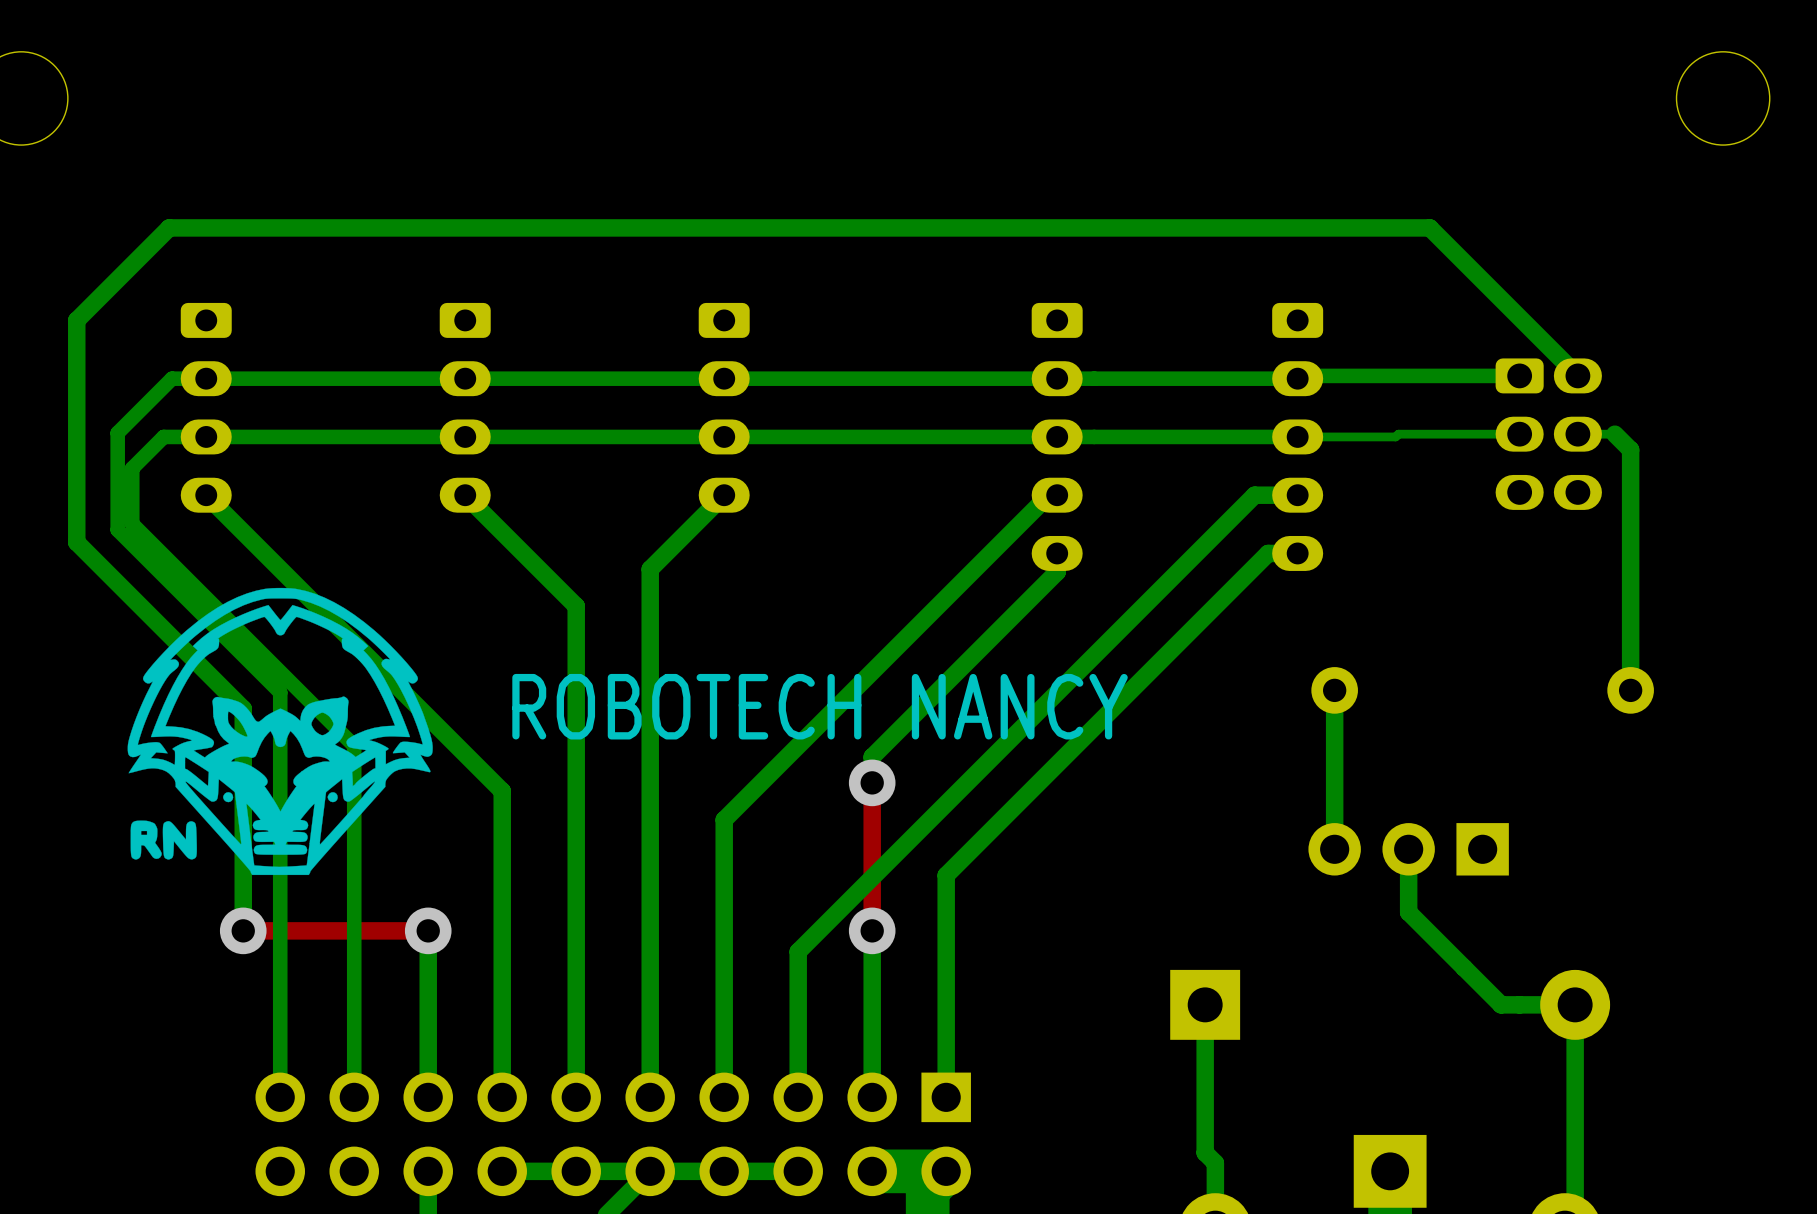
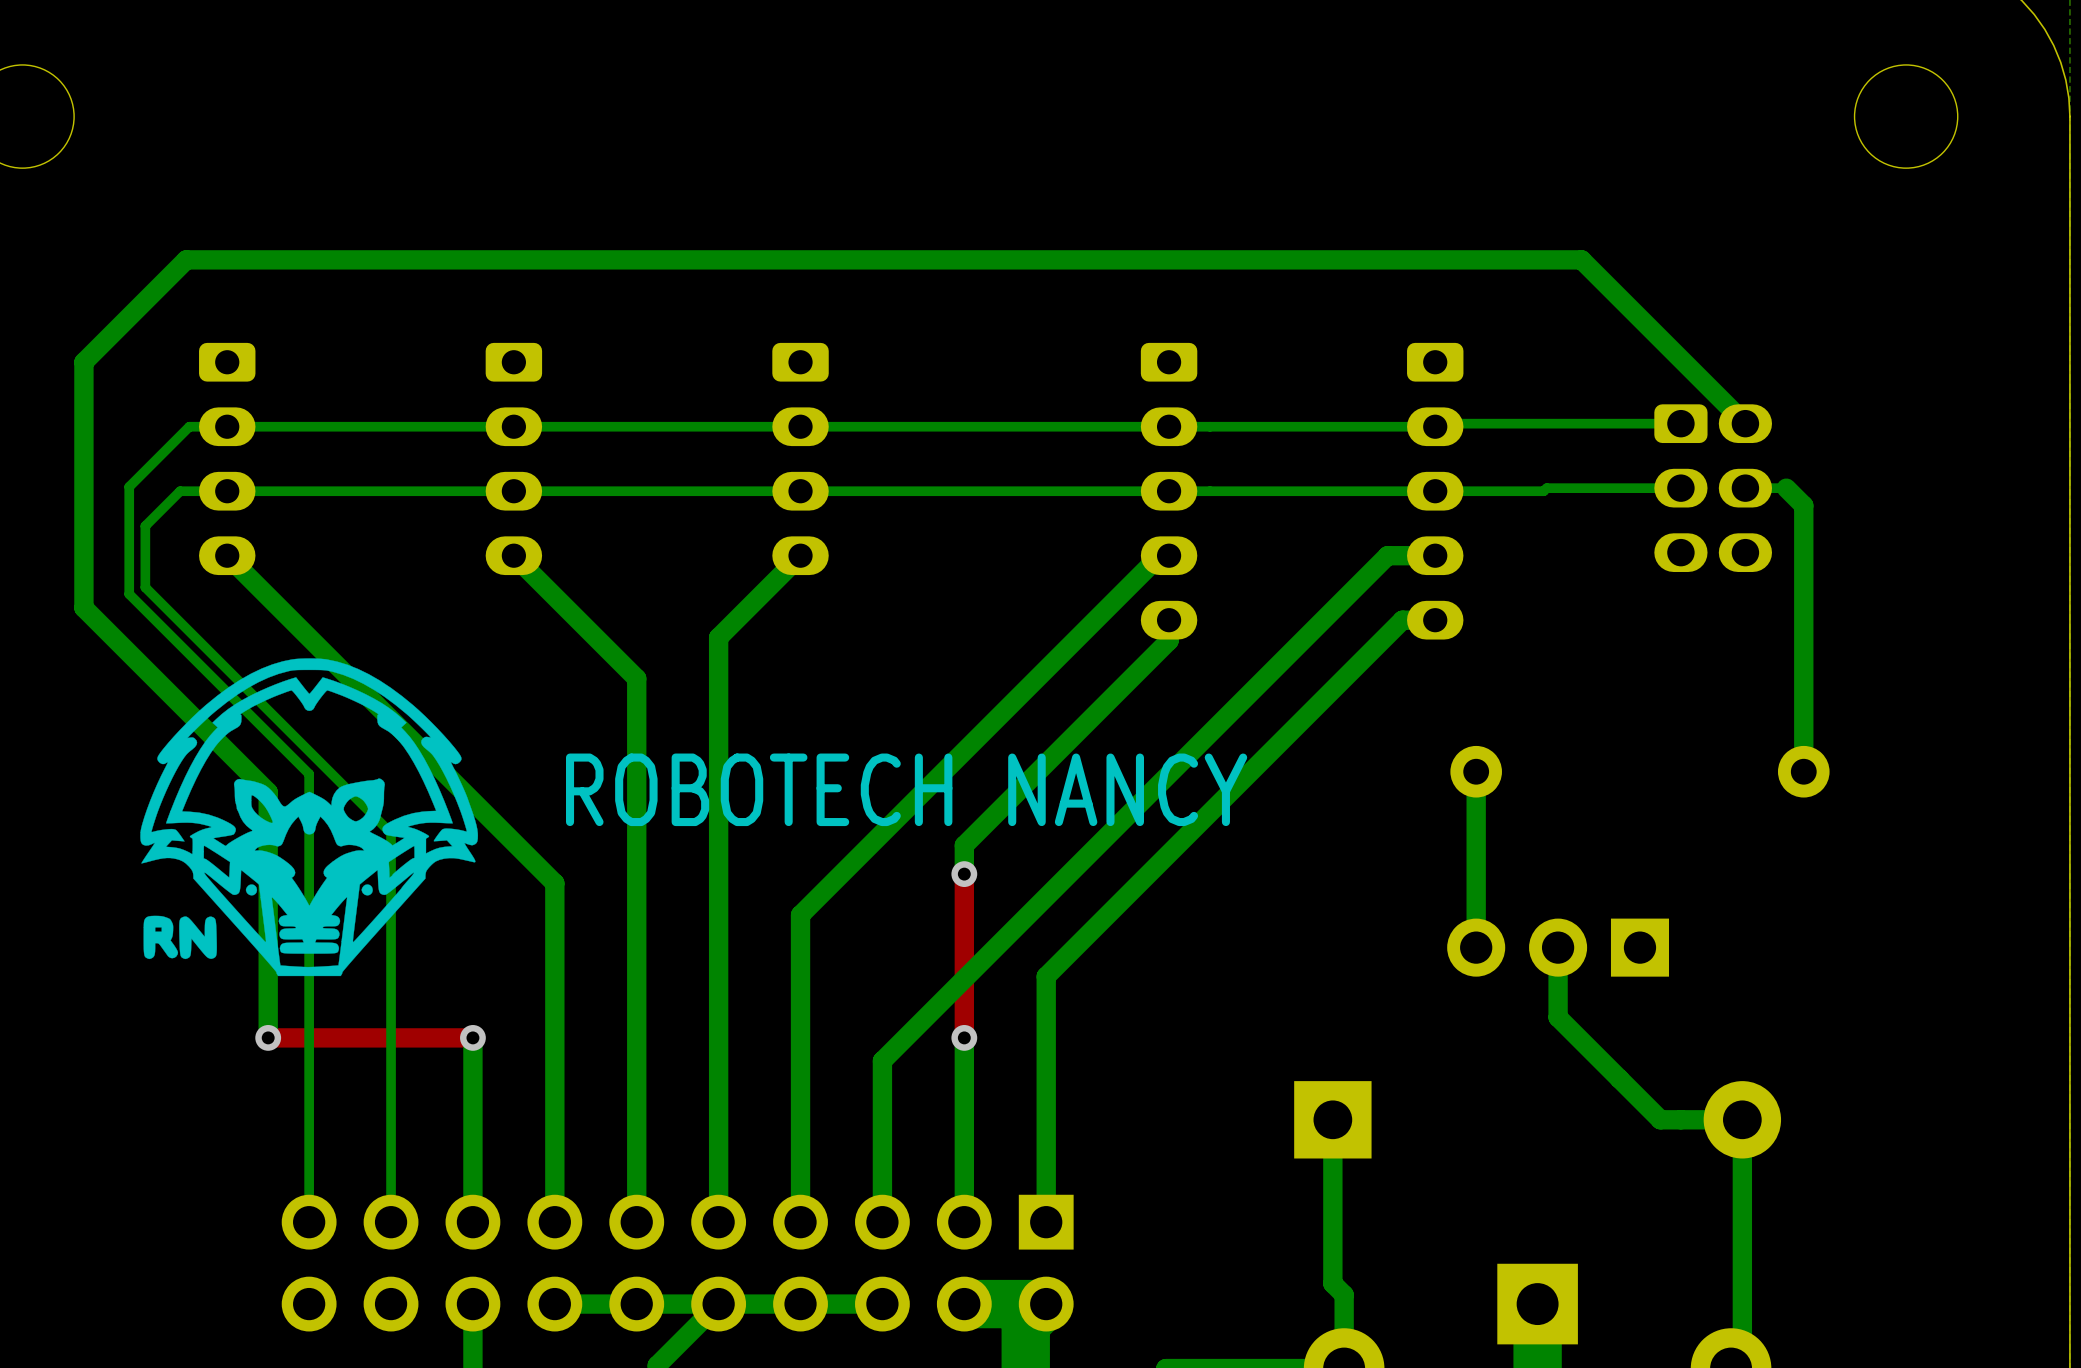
bottom track width: thick (1519, 375) (1300, 375) -> thin (1680, 423) (1438, 423)
bottom track width: thick (1316, 378) (172, 378) (117, 433) (117, 529) (280, 692) (280, 1097) -> thin (1455, 426) (189, 426) (129, 486) (129, 594) (309, 774) (309, 1222)
bottom track width: thick (1297, 436) (163, 436) (132, 468) (132, 523) (354, 745) (354, 1097) -> thin (1435, 491) (180, 491) (145, 526) (145, 587) (391, 833) (391, 1222)
via size: [848, 759, 896, 807] -> [951, 861, 978, 888]
via size: [219, 907, 267, 955] -> [255, 1025, 282, 1051]
via size: [404, 907, 452, 955] -> [460, 1025, 486, 1051]
via size: [848, 907, 896, 955] -> [951, 1025, 978, 1051]

